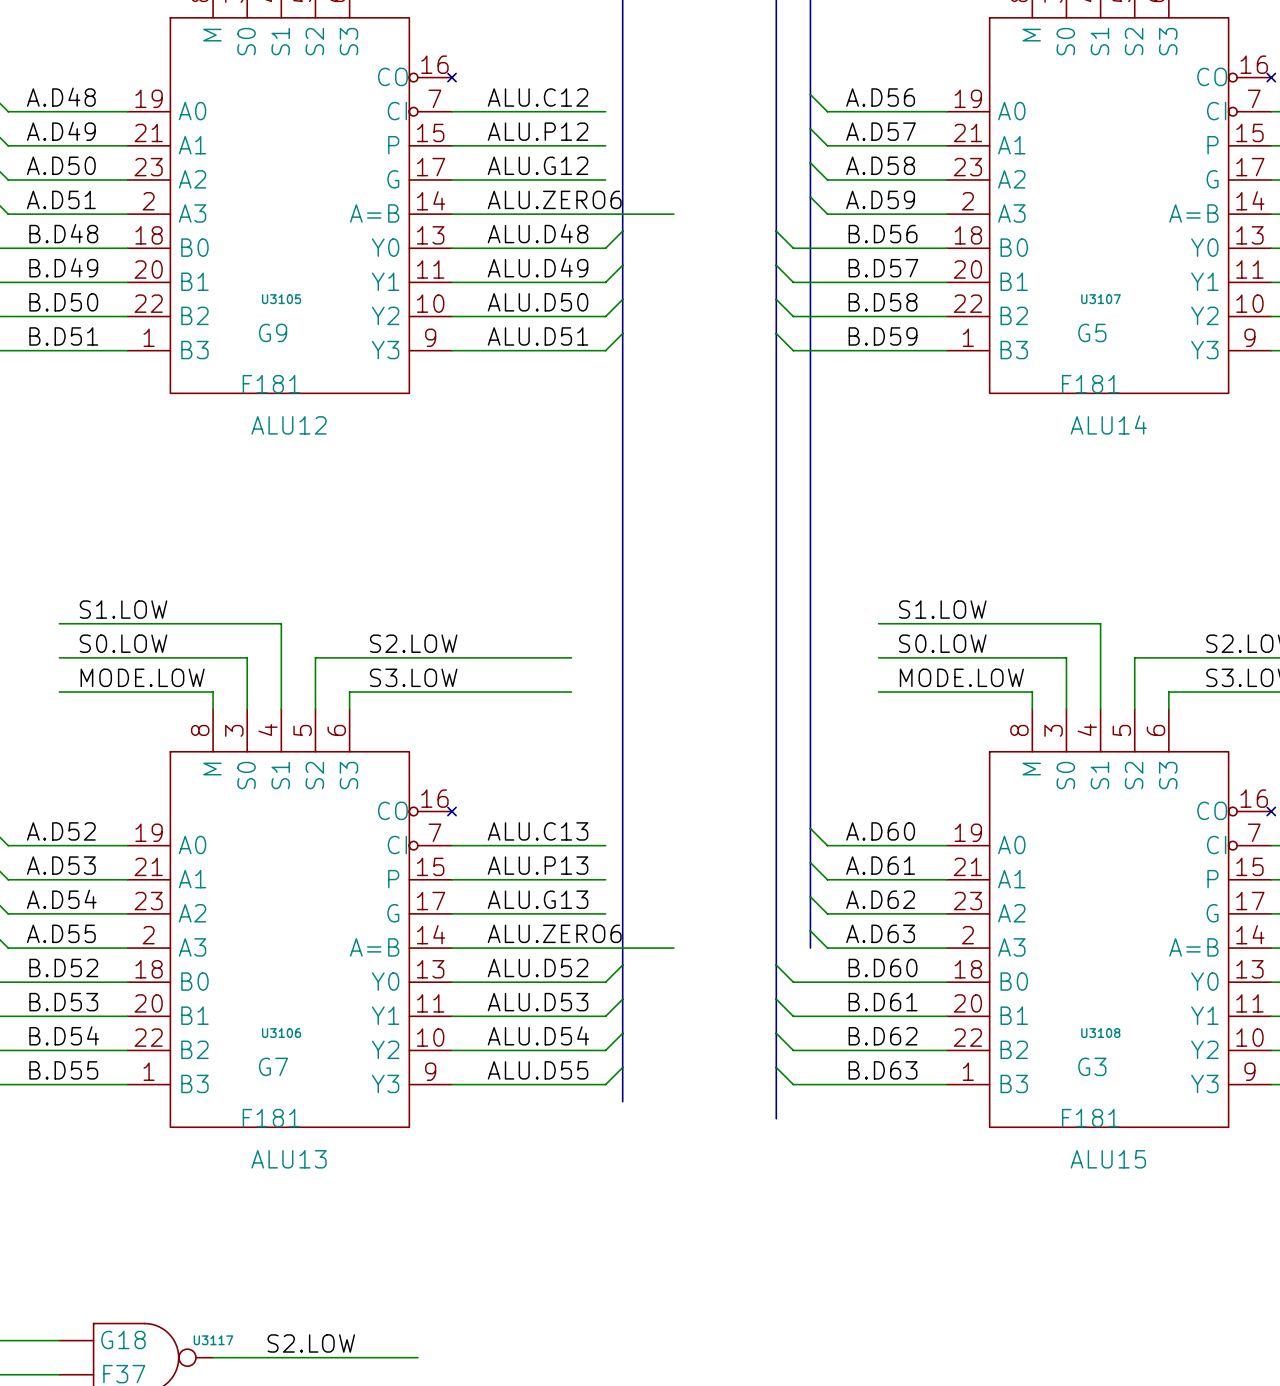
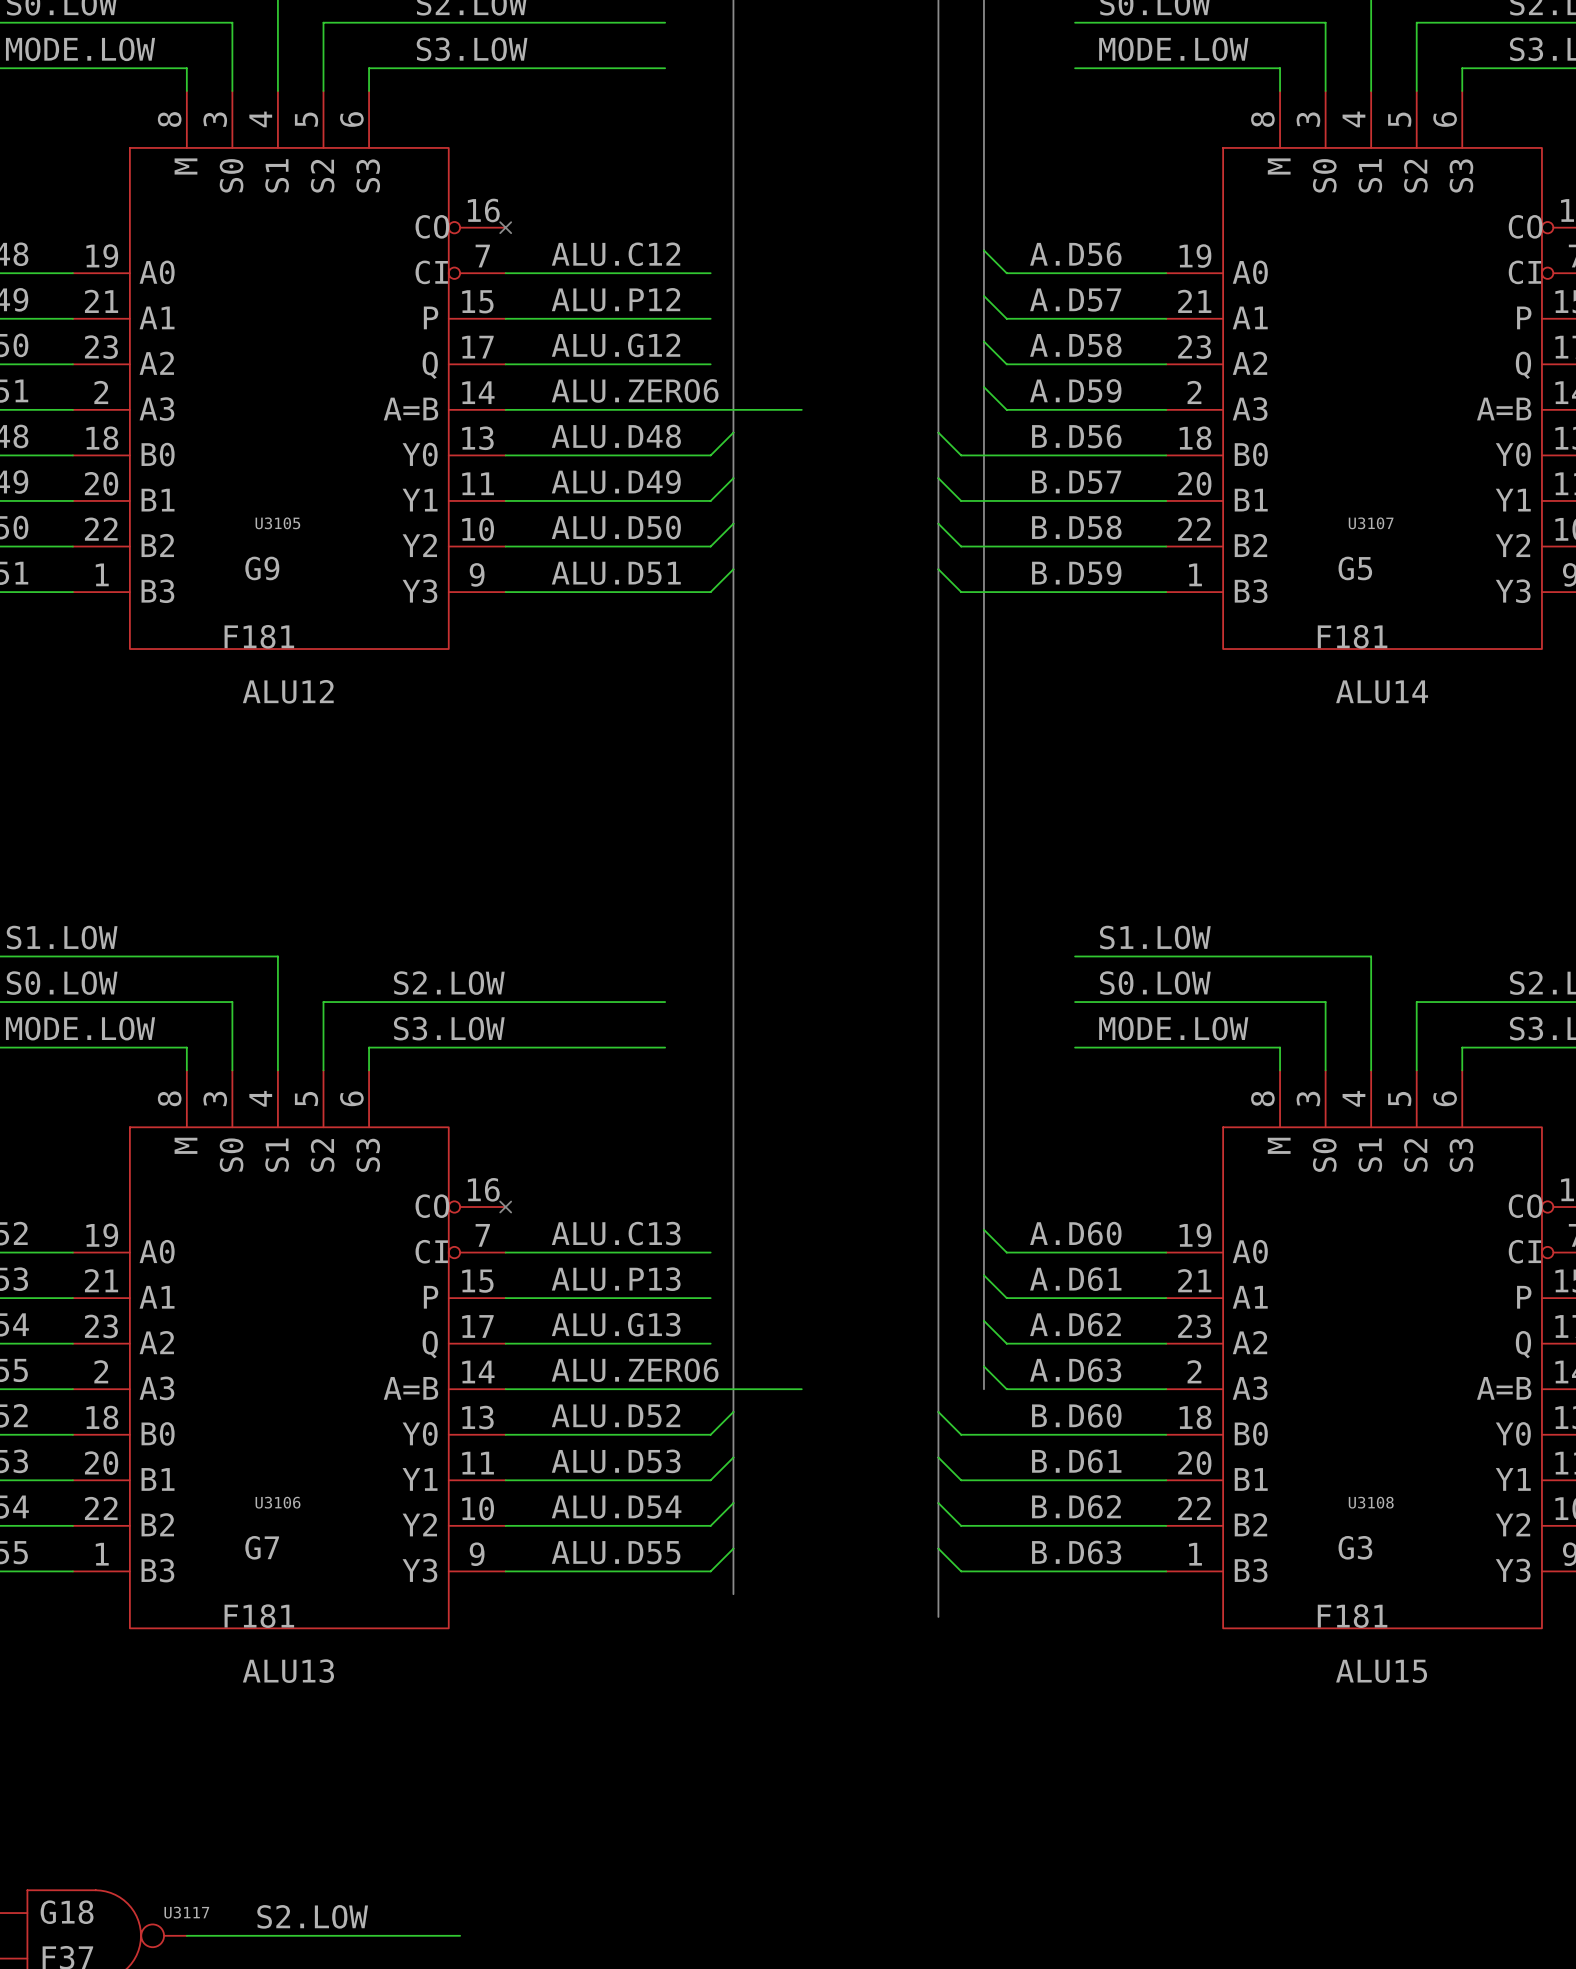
U3105 pin name: G (393, 179) -> Q (430, 365)
U3107 pin name: G (1212, 179) -> Q (1523, 365)
U3106 pin name: G (393, 913) -> Q (430, 1344)
U3108 pin name: G (1212, 913) -> Q (1523, 1344)

